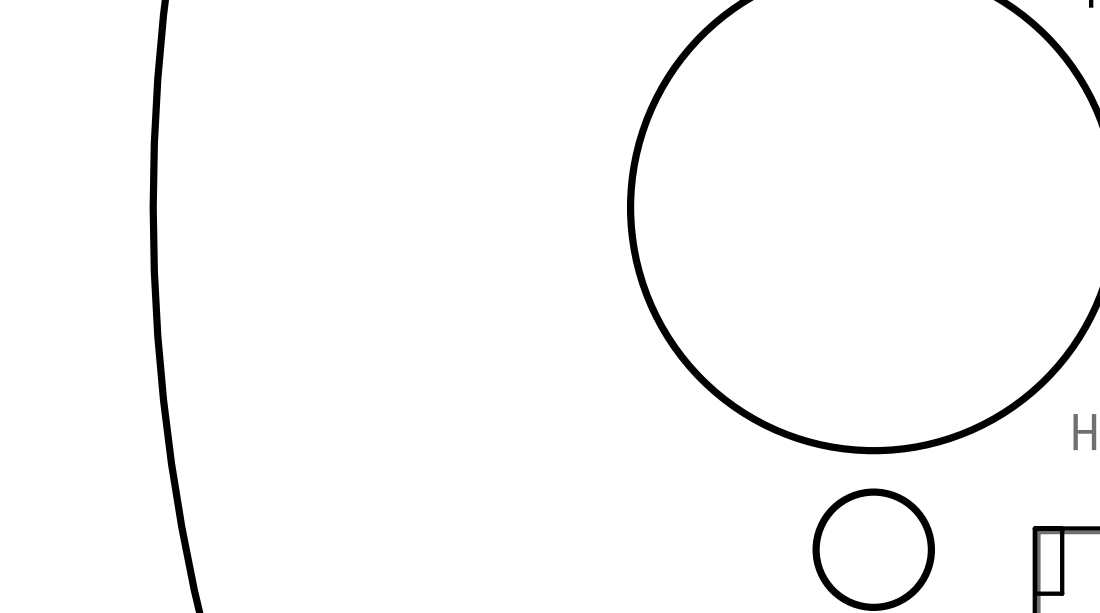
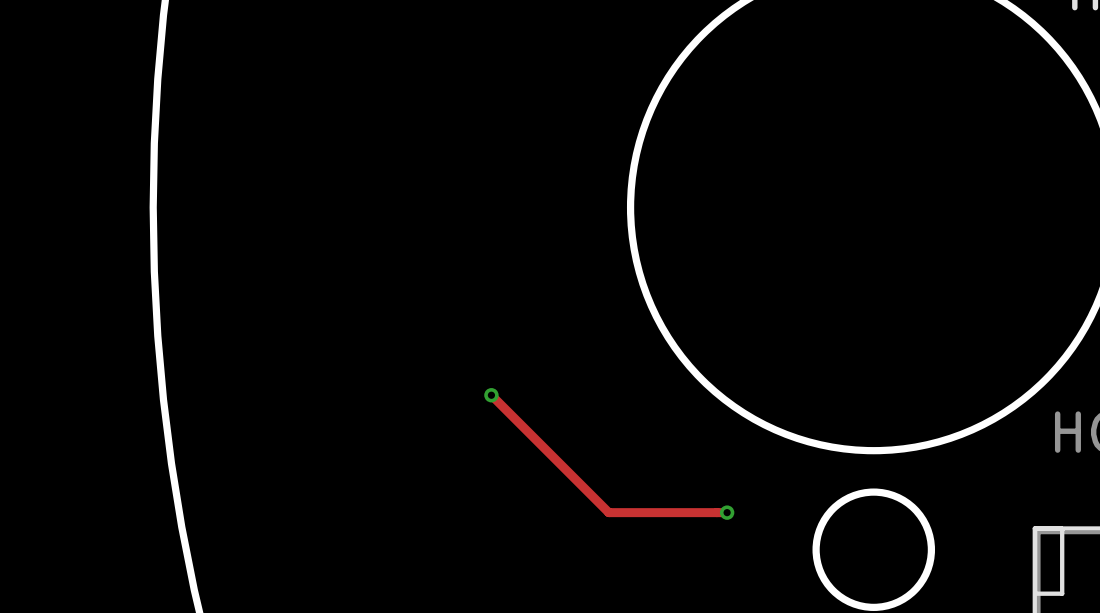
track: none -> (491, 395) (608, 512) (727, 512)
via: none -> (491, 395)
via: none -> (727, 512)

